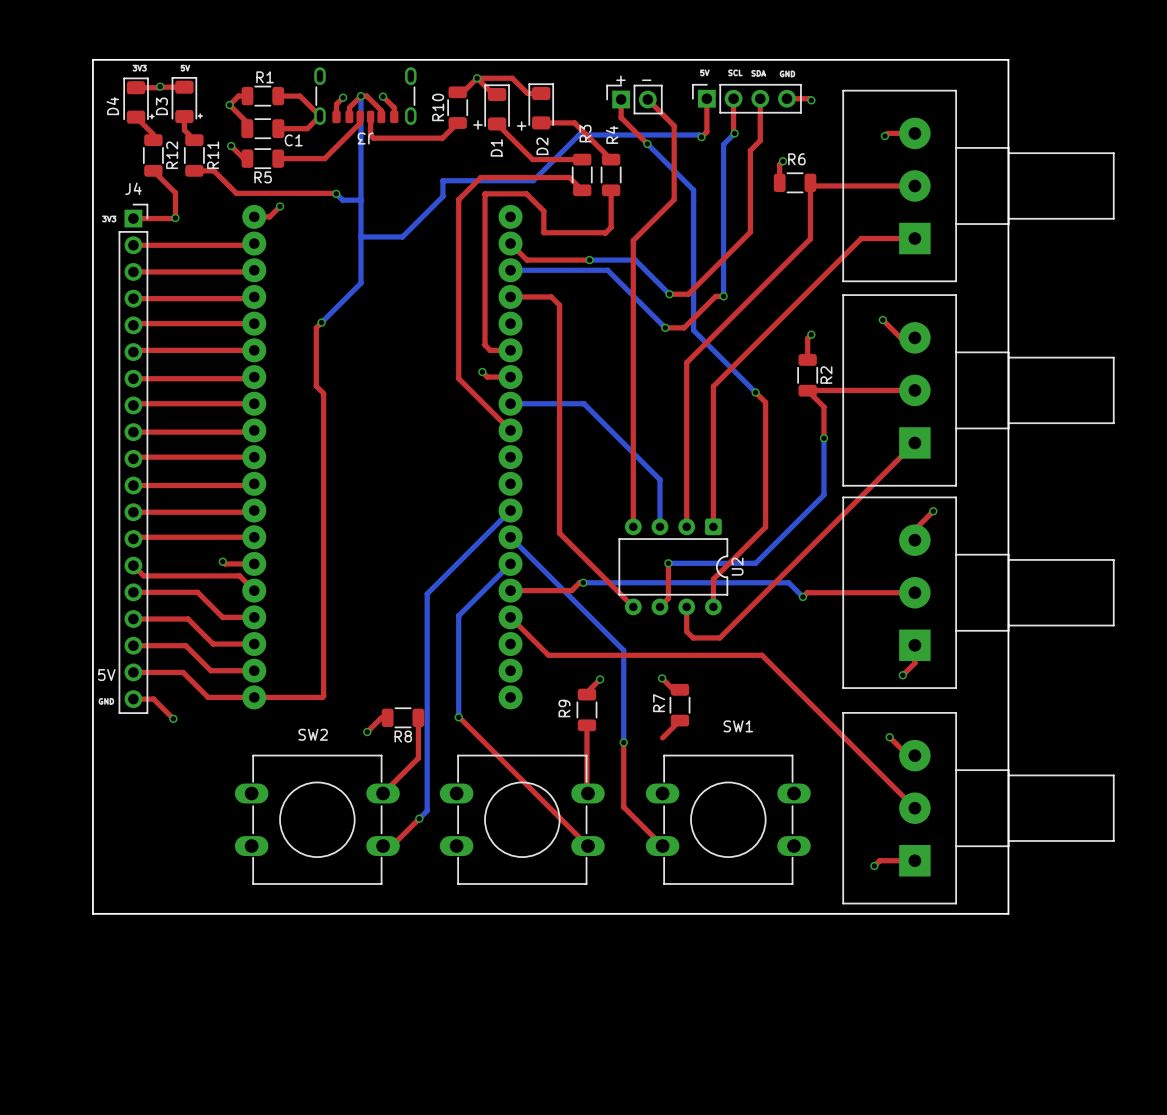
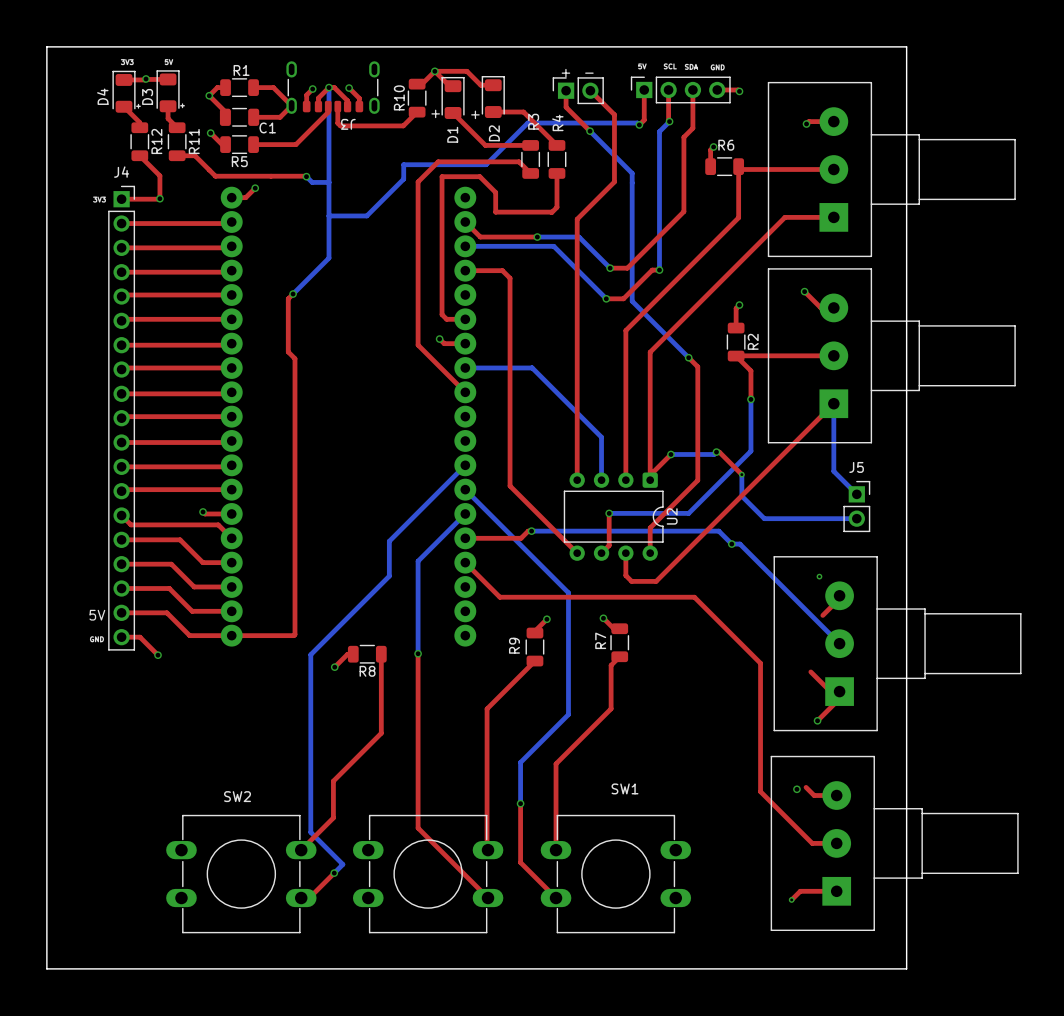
board edge: (92, 59) (1008, 59) (1008, 913) (92, 913) (92, 59) -> (46, 46) (46, 968) (906, 968) (906, 46) (46, 46)
J3 name position: J3 (365, 138) -> J3 (348, 124)
bottom track: none -> (833, 403) (833, 471) (856, 494)
top track: none -> (716, 452) (719, 452) (741, 474)
bottom track: none -> (716, 452) (714, 454) (670, 454)
via: none -> (716, 452)
top track: none -> (670, 454) (650, 475)
via: none -> (670, 454)
top track: (933, 511) (914, 529) (914, 540) -> none
via: (933, 511) -> none
bottom track: none -> (741, 474) (741, 496) (764, 518) (856, 518)
via: none -> (741, 474)
J5: none -> (856, 506)
top track: (914, 592) (807, 592) (802, 596) -> none
part: (978, 592) -> none
bottom track: none -> (731, 544) (739, 544) (839, 643)
bottom track: (427, 632) (427, 810) (419, 818) -> (389, 576) (310, 654) (310, 832) (342, 864) (334, 873)
via: none -> (819, 576)
via: (902, 675) -> none
part: none -> (897, 643)
top track: none -> (418, 653) (418, 828) (488, 898)
top track: (459, 717) (588, 846) -> none
top track: (586, 725) (586, 792) -> (534, 661) (487, 708) (487, 849)
top track: (834, 727) (914, 808) -> (760, 663) (760, 791) (812, 843) (836, 843)
top track: (670, 730) (662, 737) -> (611, 665) (611, 708) (556, 763) (556, 850)
via position: (889, 737) -> (817, 720)
top track: (623, 742) (623, 807) (662, 846) -> (520, 803) (520, 862) (556, 898)
bottom track: none -> (568, 676) (568, 714) (520, 762) (520, 803)
via: (623, 742) -> none
top track: (418, 758) (383, 793) -> (381, 690) (381, 733) (333, 781) (333, 817) (301, 850)
top track: none -> (839, 691) (839, 698) (817, 720)
part: (978, 808) -> none
top track: (419, 818) (391, 846) (383, 846) -> (334, 873) (309, 898) (301, 898)
via: (419, 818) -> none
SW2 position: (317, 819) -> (241, 874)
part position: (522, 819) -> (428, 874)
SW1 position: (728, 819) -> (615, 874)
top track: (914, 860) (879, 860) (874, 866) -> none
top track: none -> (806, 787) (814, 795) (836, 795)
via: none -> (520, 803)
part: none -> (894, 843)
via: none -> (334, 873)
top track: none -> (836, 891) (800, 891) (791, 899)
via: none -> (791, 899)

